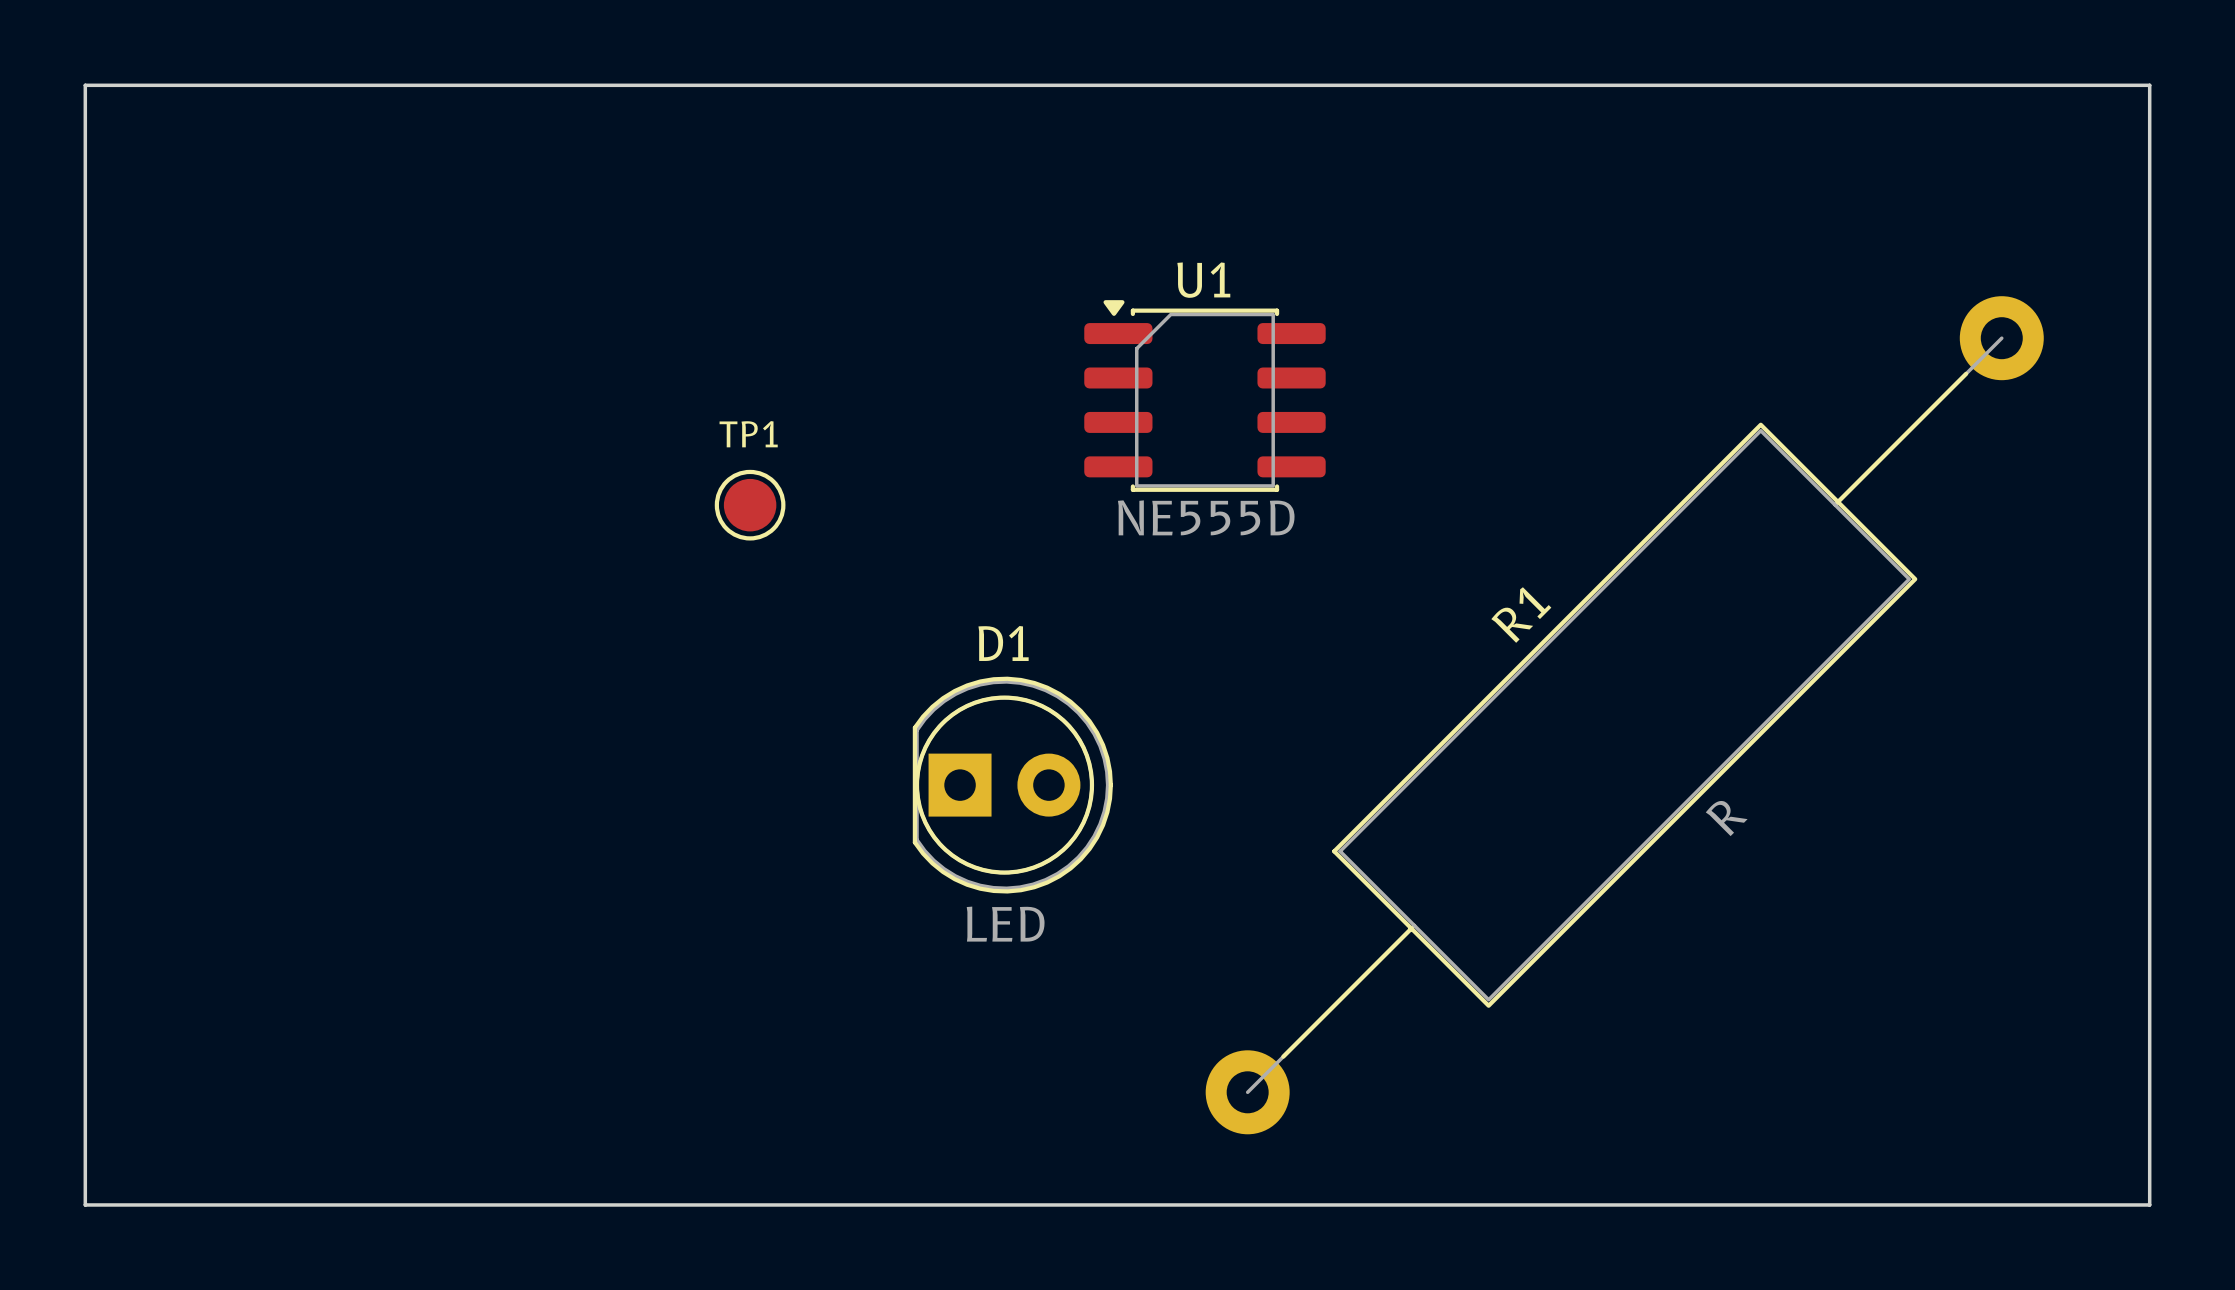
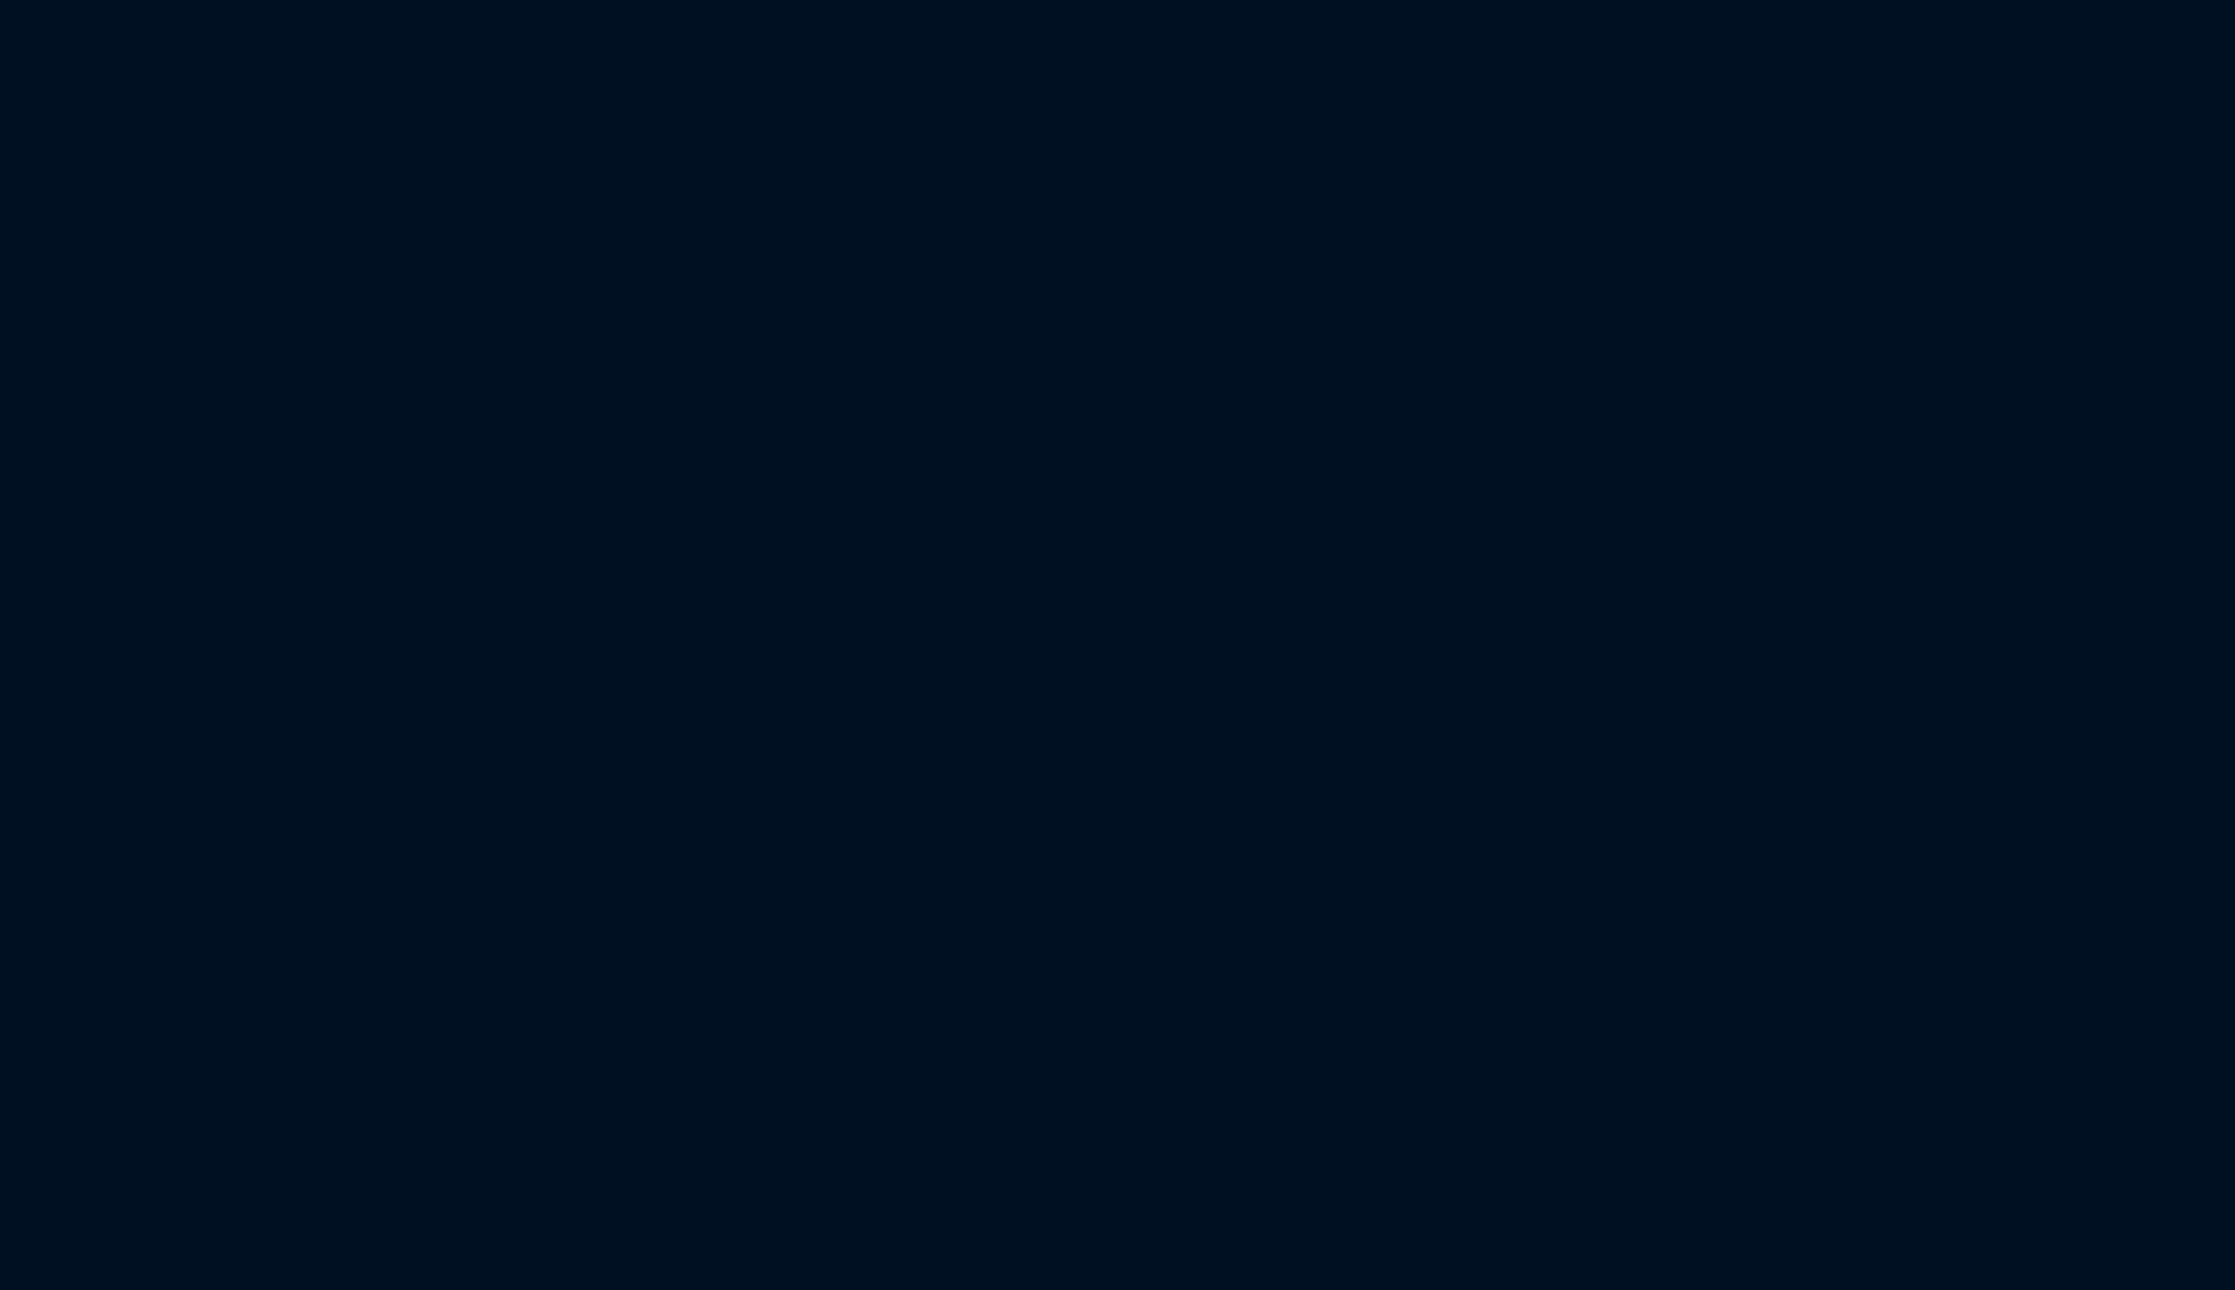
board edge: (85, 85) (2149, 85) (2149, 1204) (85, 1204) (85, 85) -> none
U1: NE555D (1204, 396) -> none
TP1: (750, 505) -> none
R1: R (1624, 715) -> none
D1: LED (1012, 785) -> none

